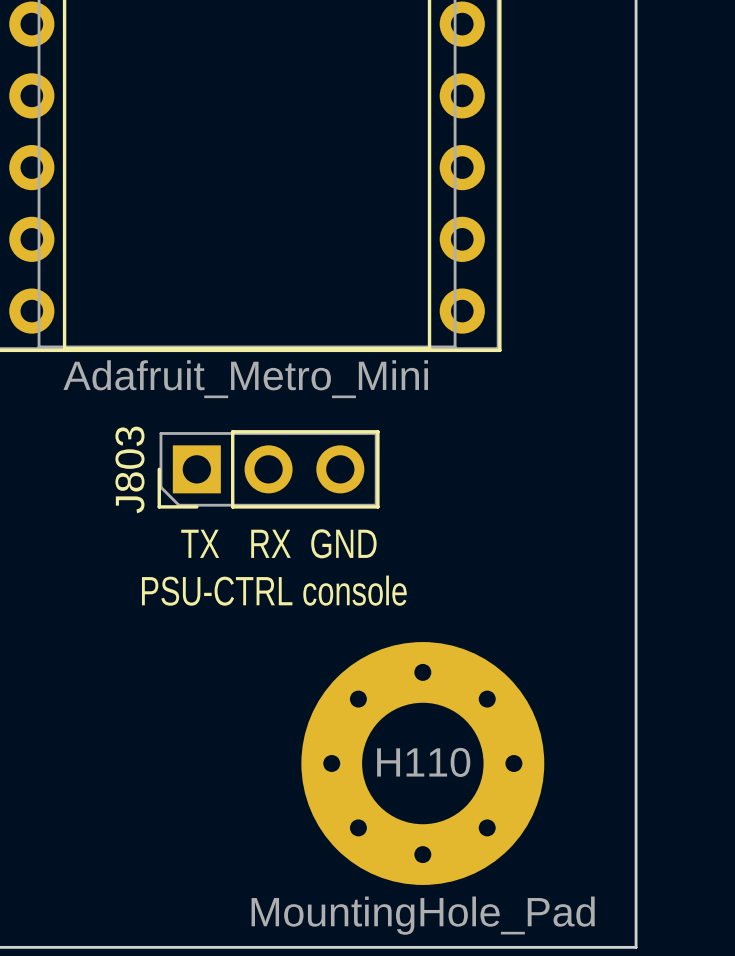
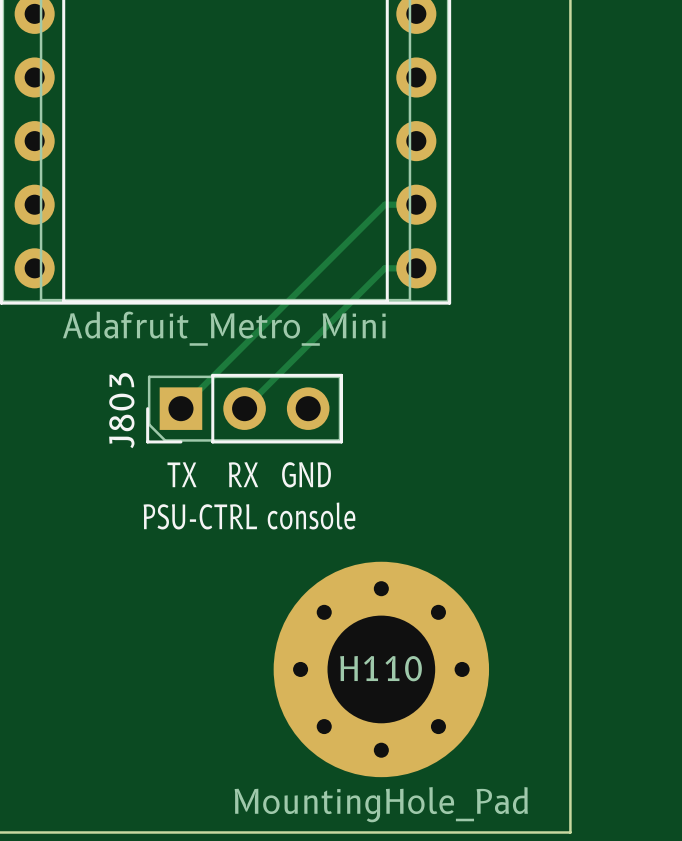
track: none -> (416, 204) (384, 204) (180, 408)
track: none -> (416, 268) (384, 268) (244, 408)

